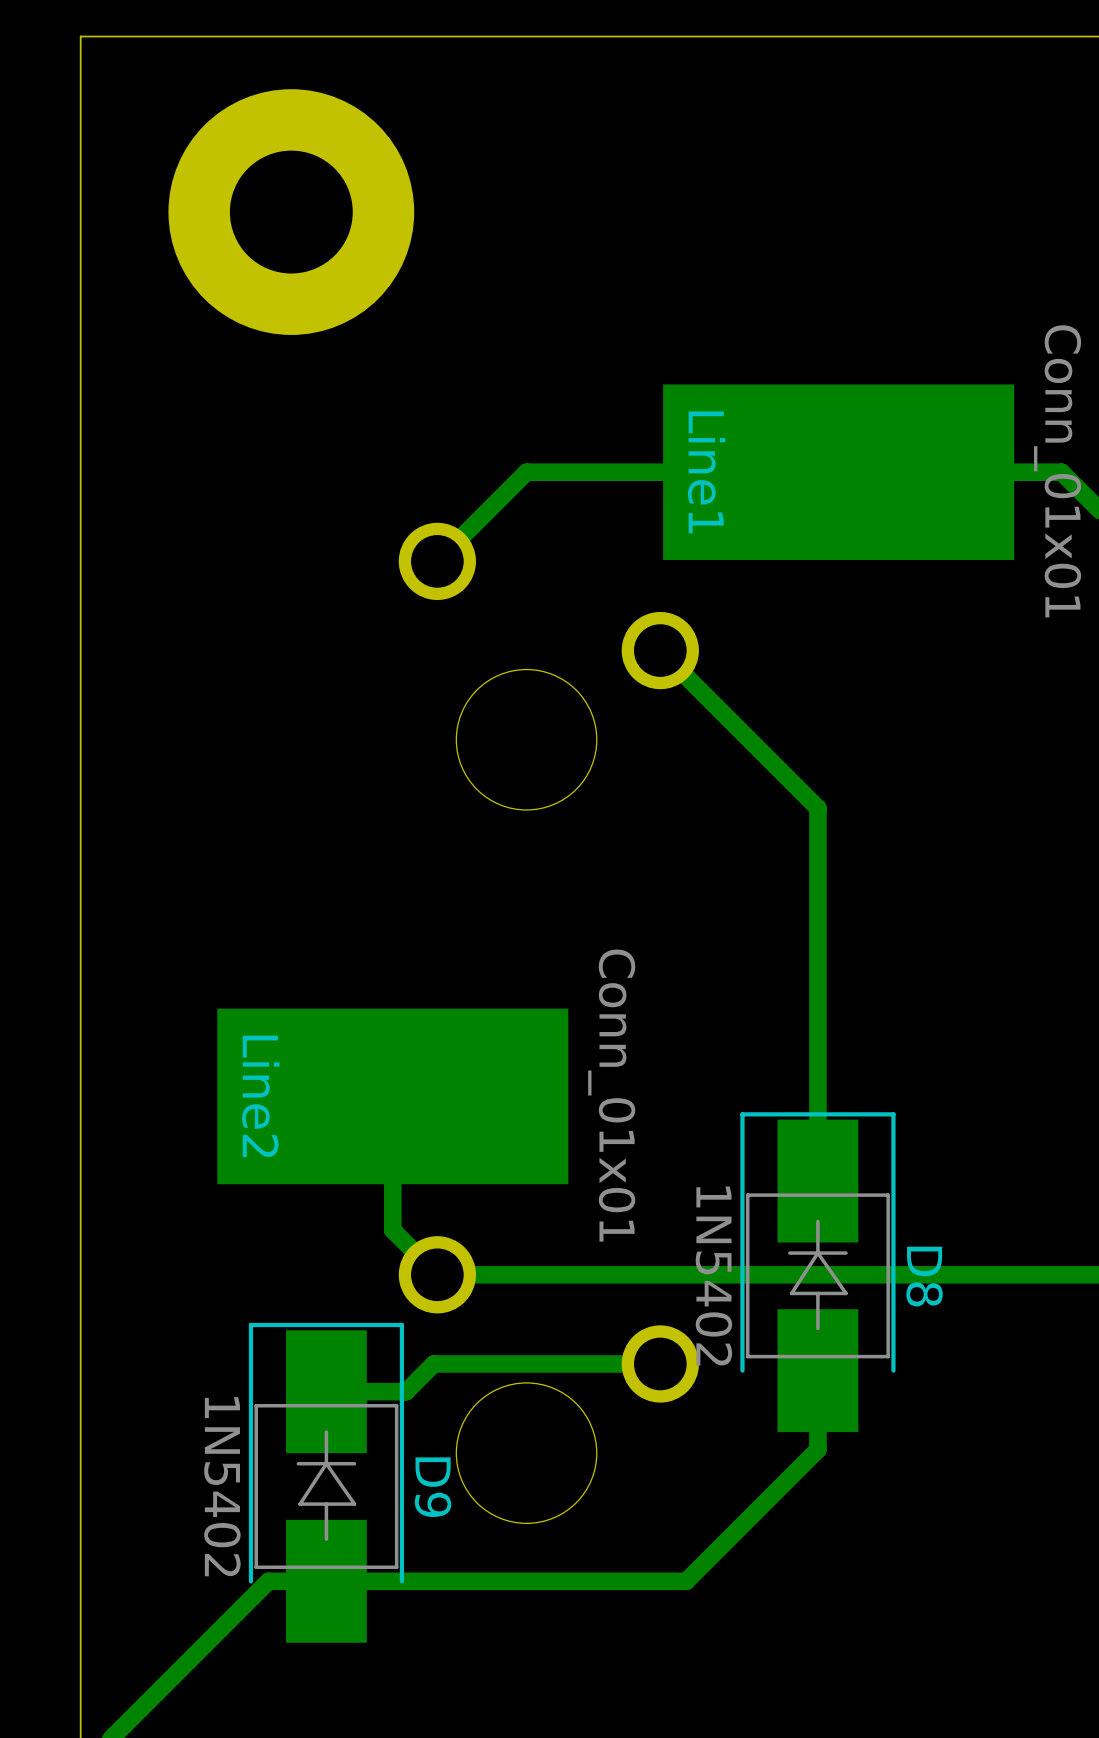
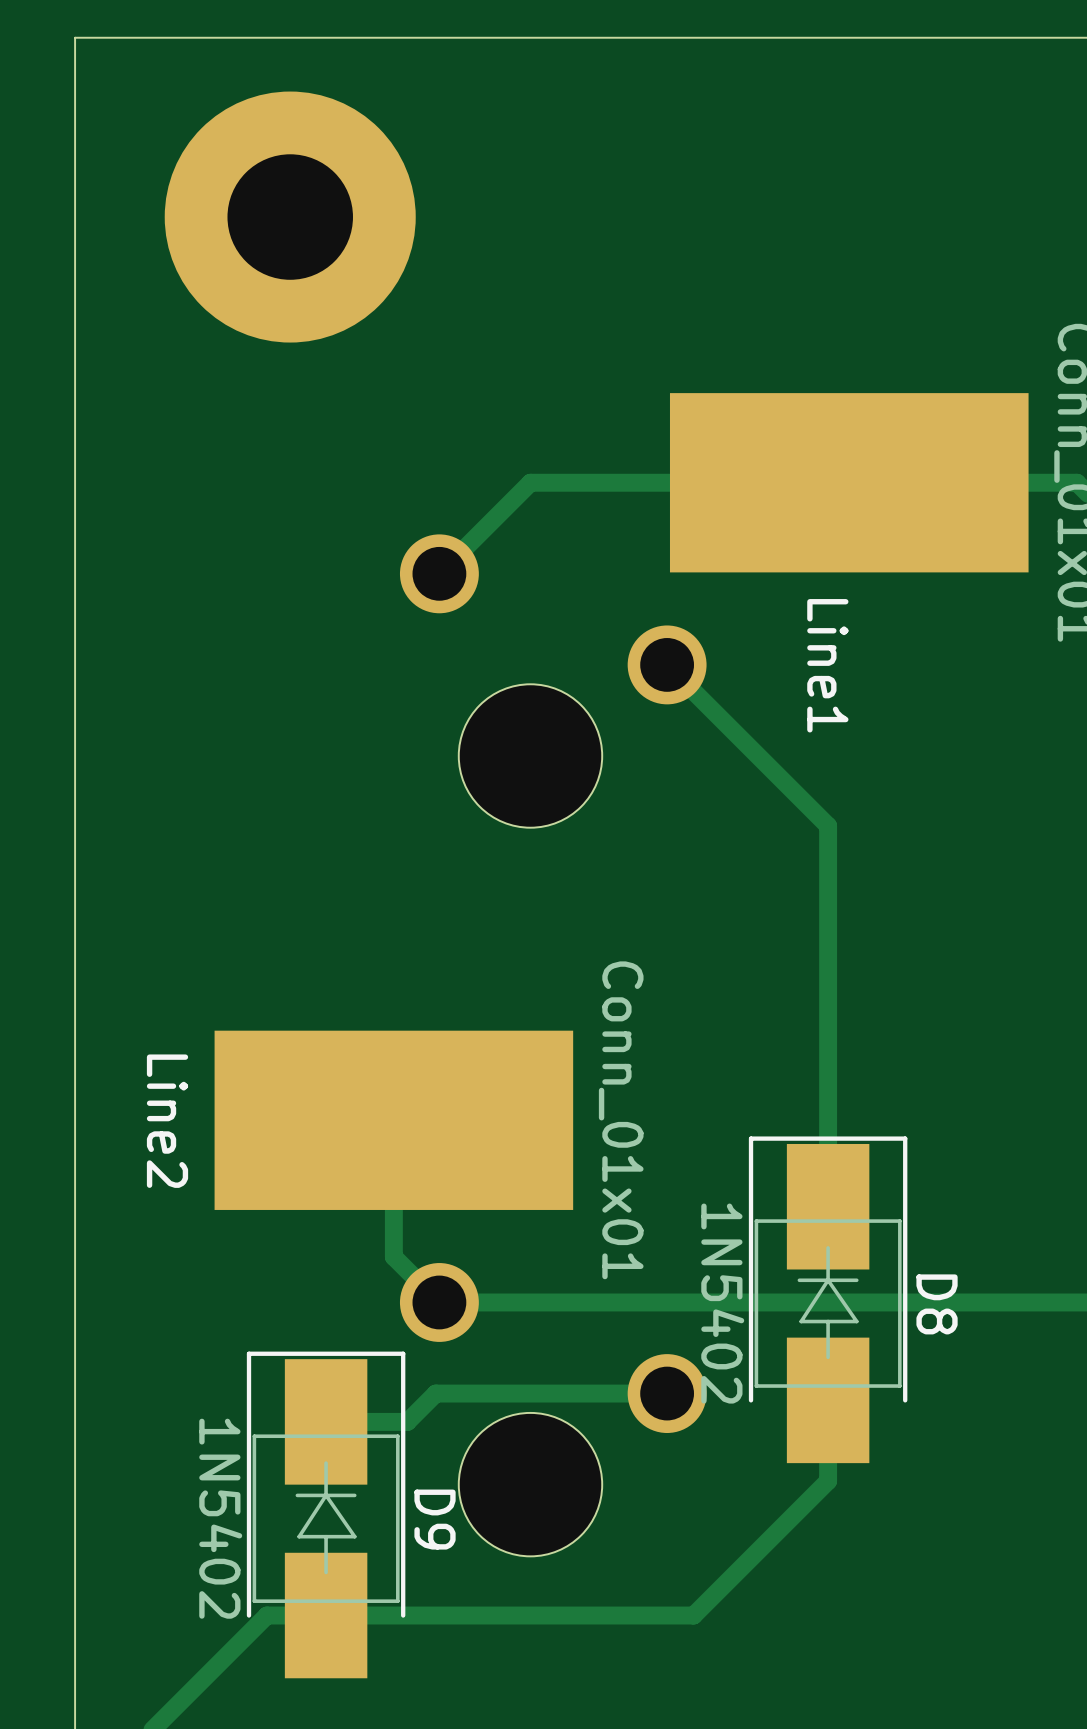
Line1 name position: Line1 (706, 472) -> Line1 (827, 665)
Line2 name position: Line2 (260, 1096) -> Line2 (167, 1121)

